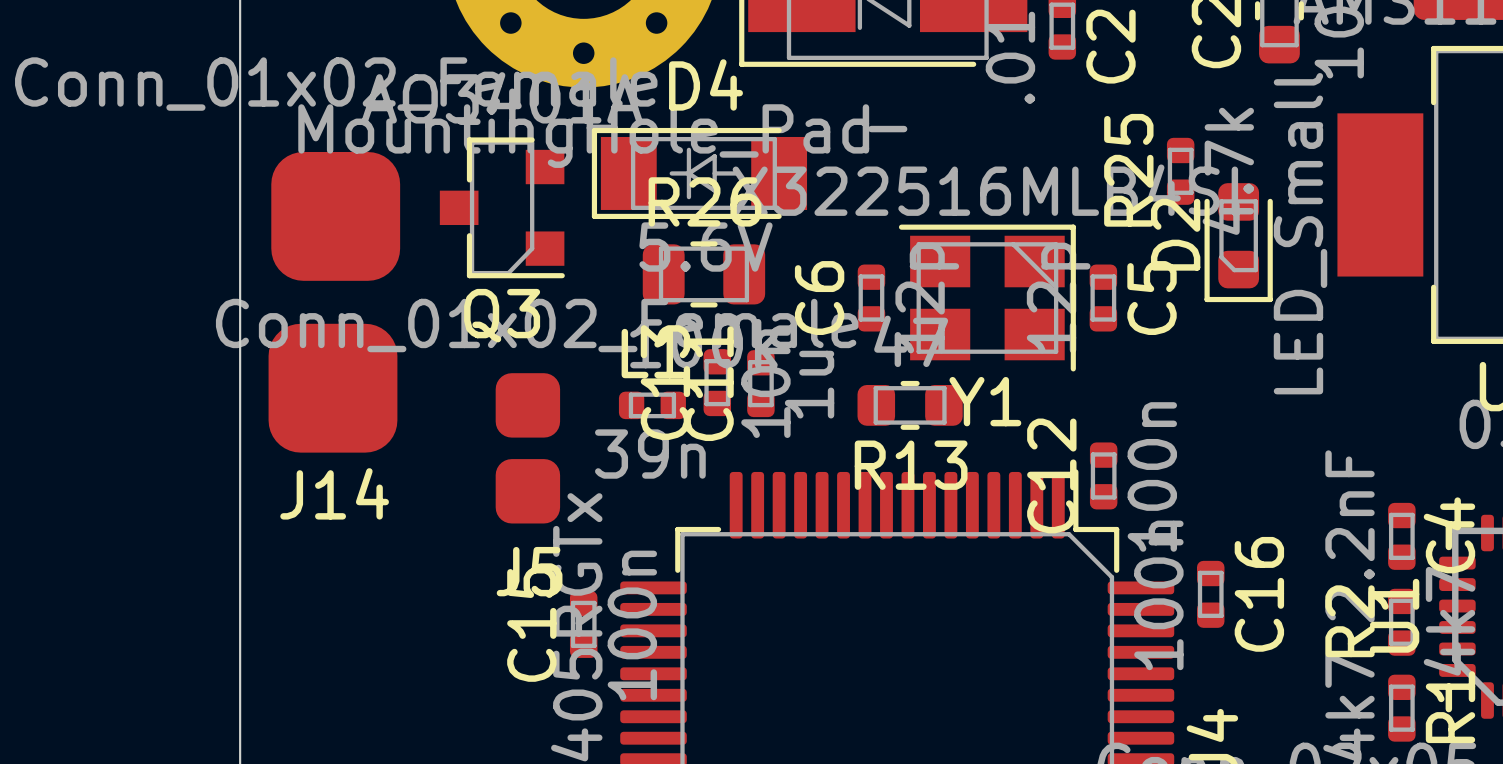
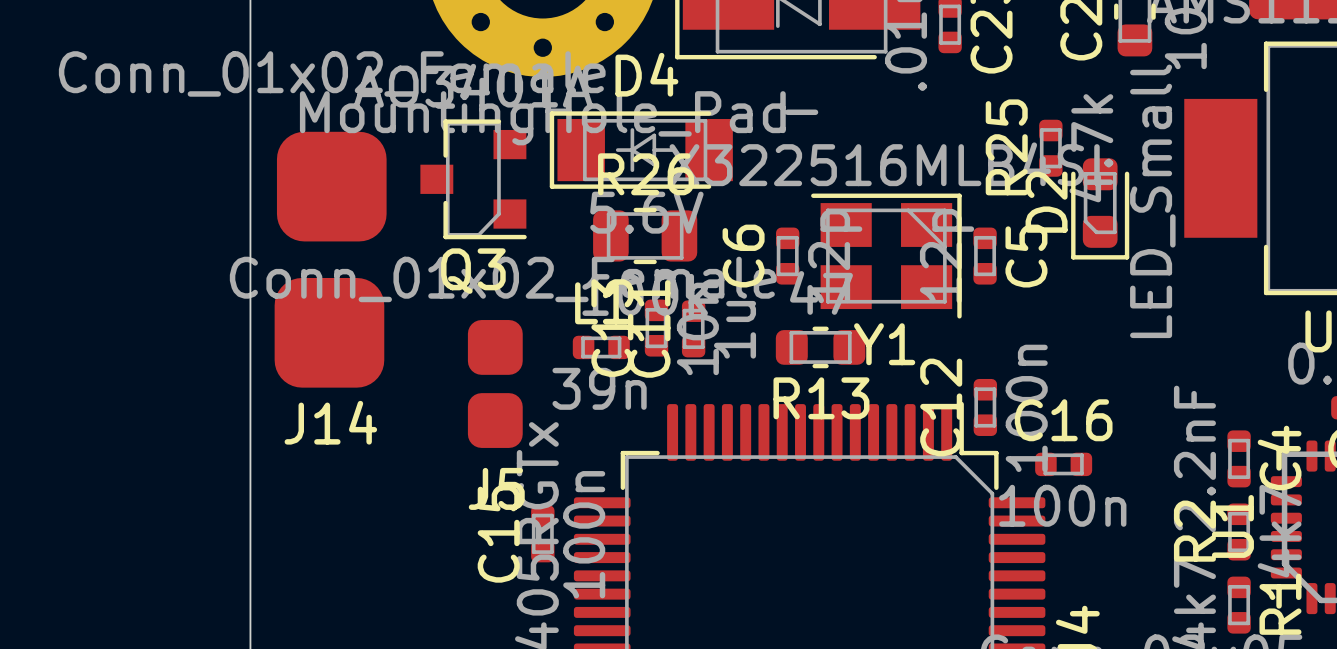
C16 rotation: 0° (1210, 594) -> 90° clockwise (1063, 464)
C16 position: (1210, 594) -> (1063, 464)

